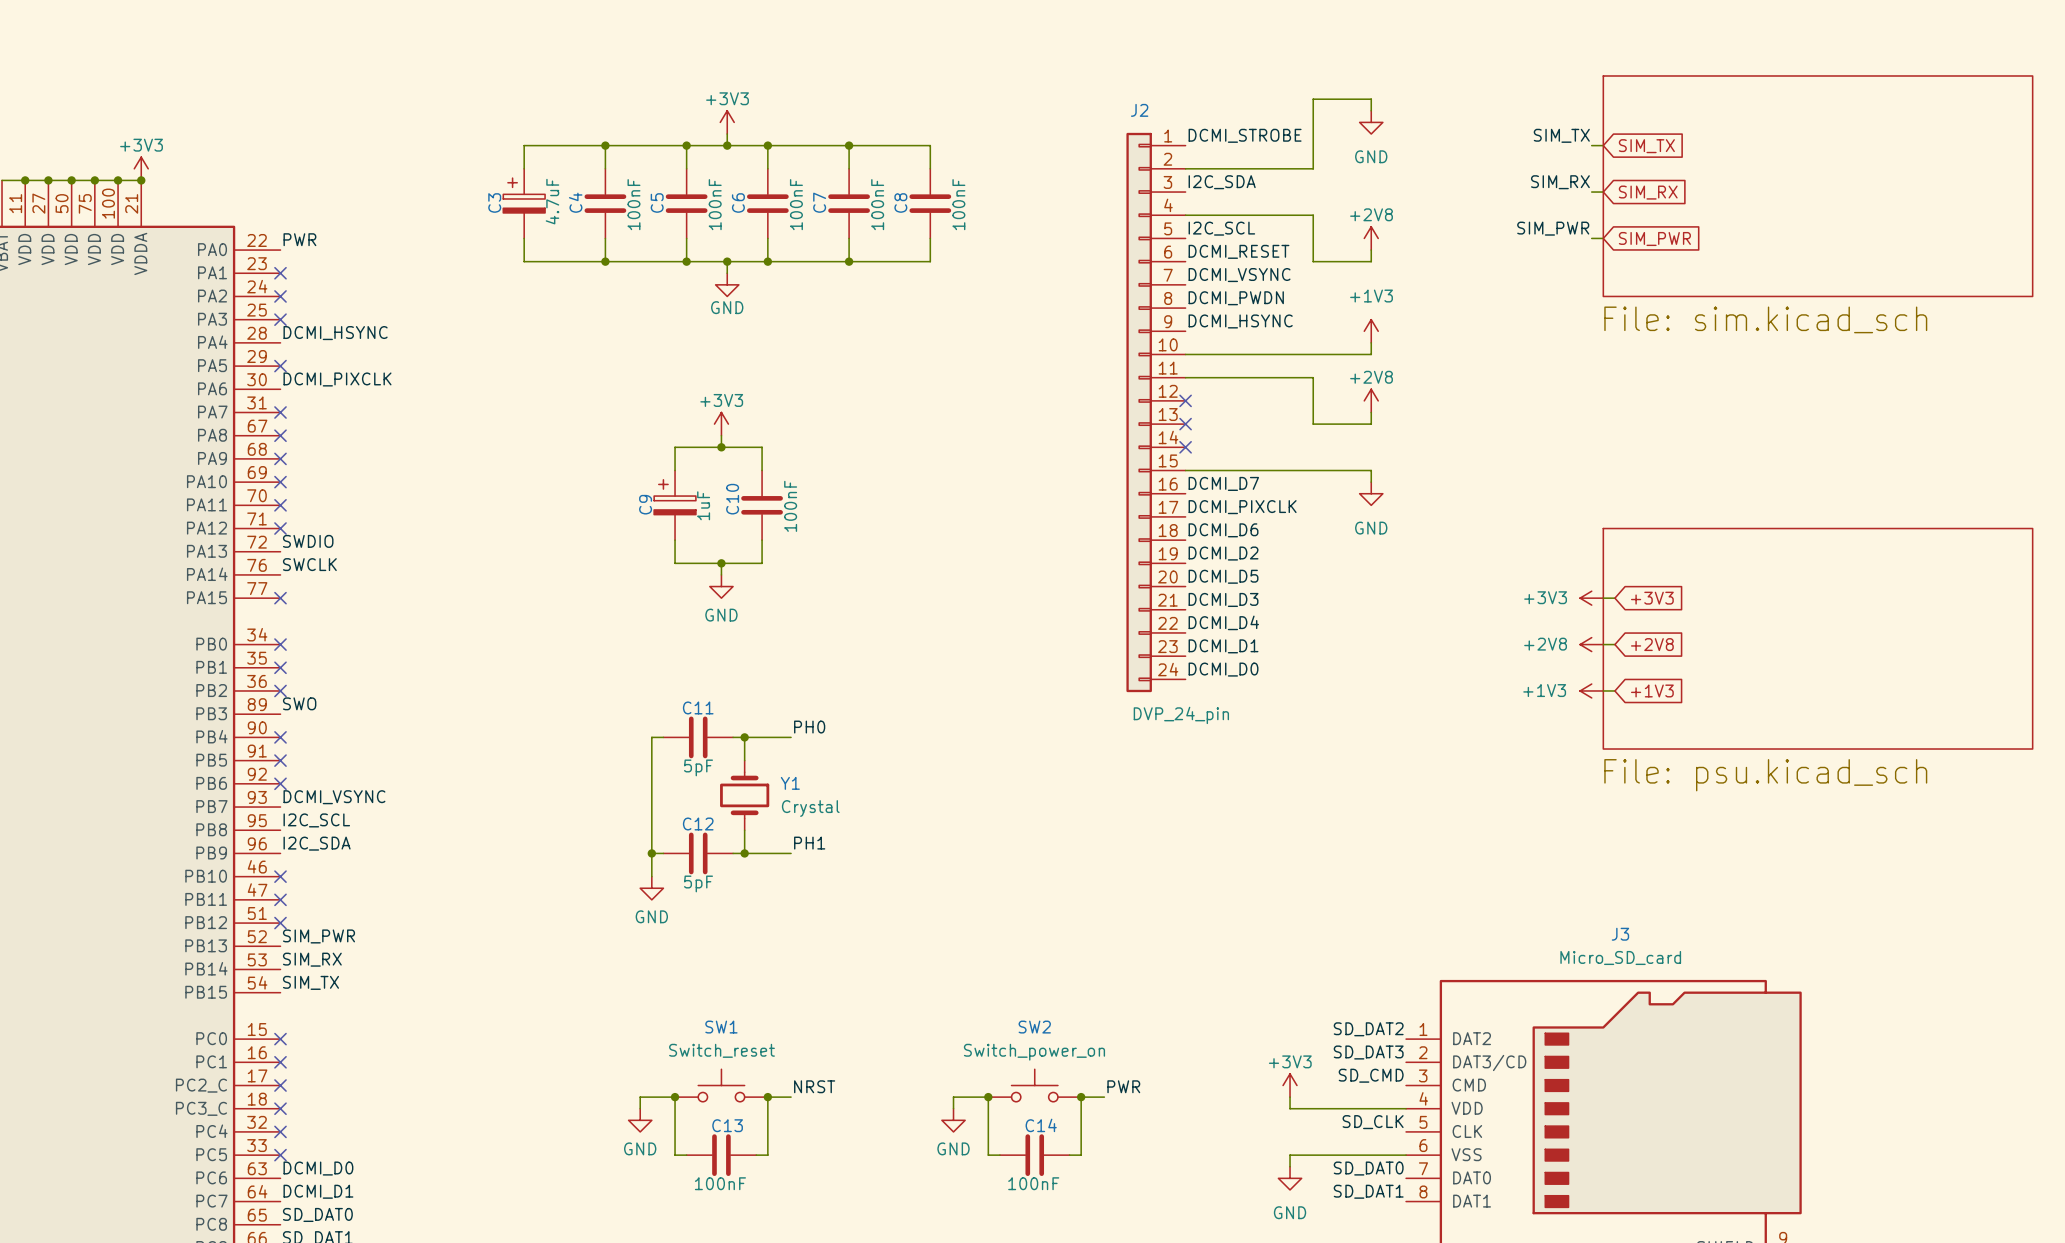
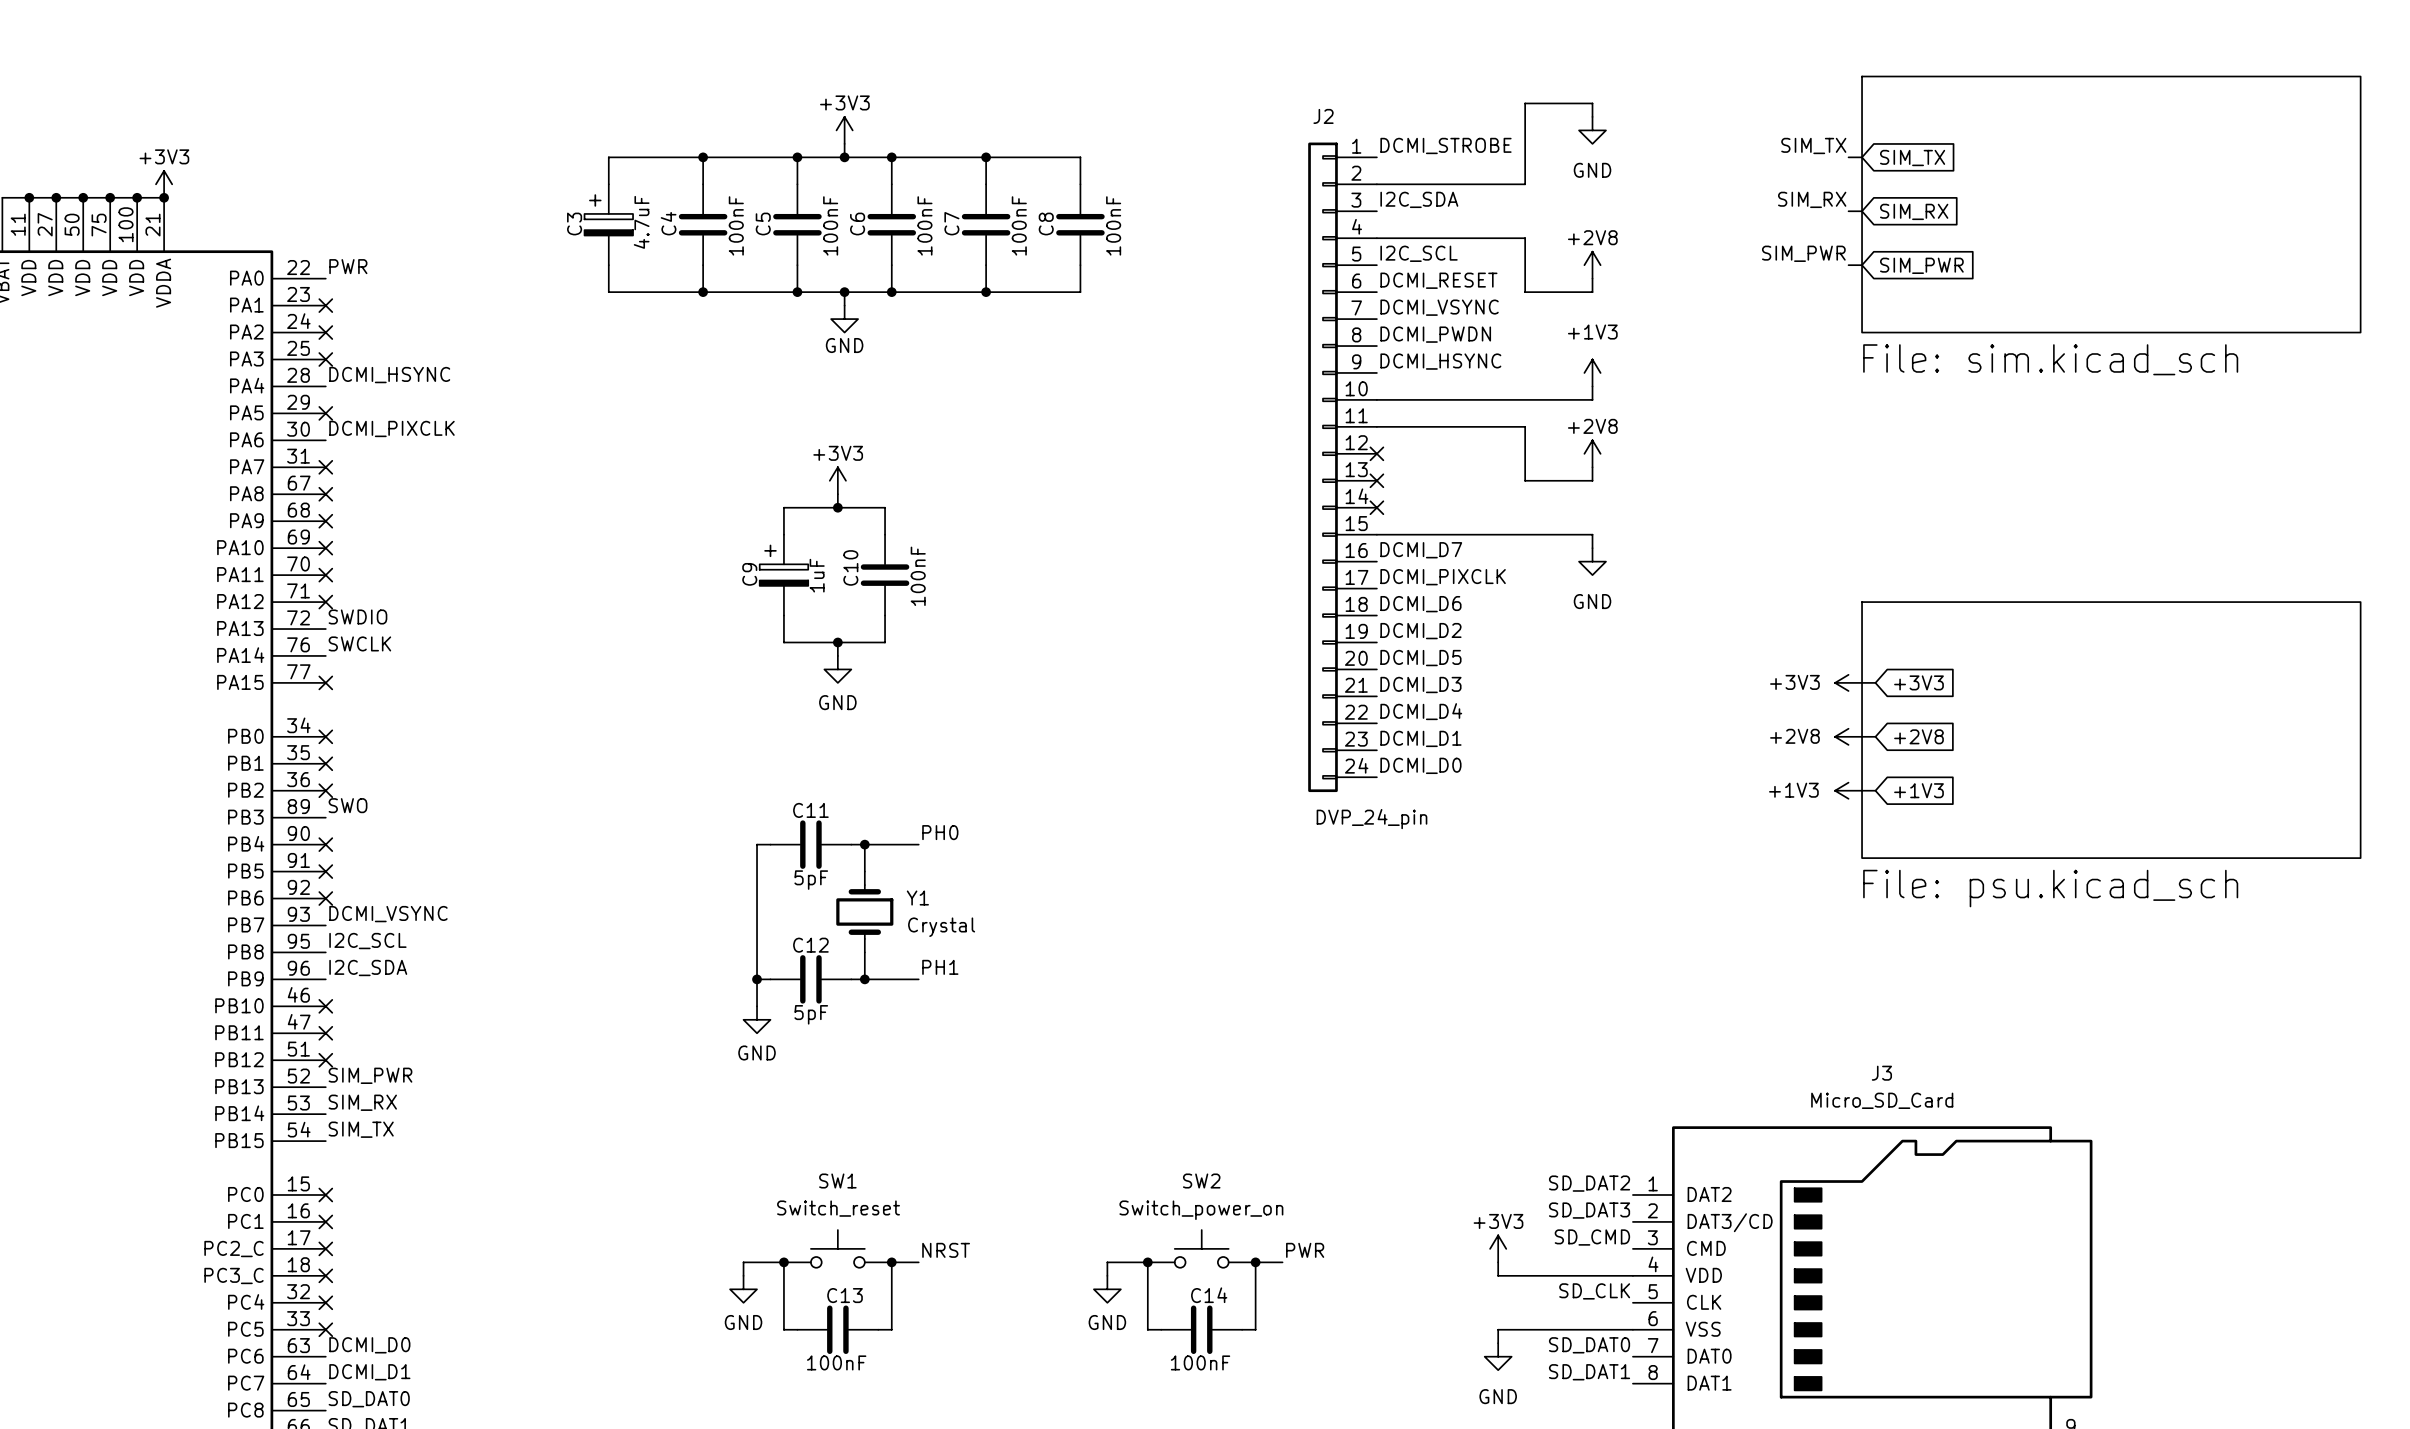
J3 value: Micro_SD_card (1620, 957) -> Micro_SD_Card (1882, 1100)

